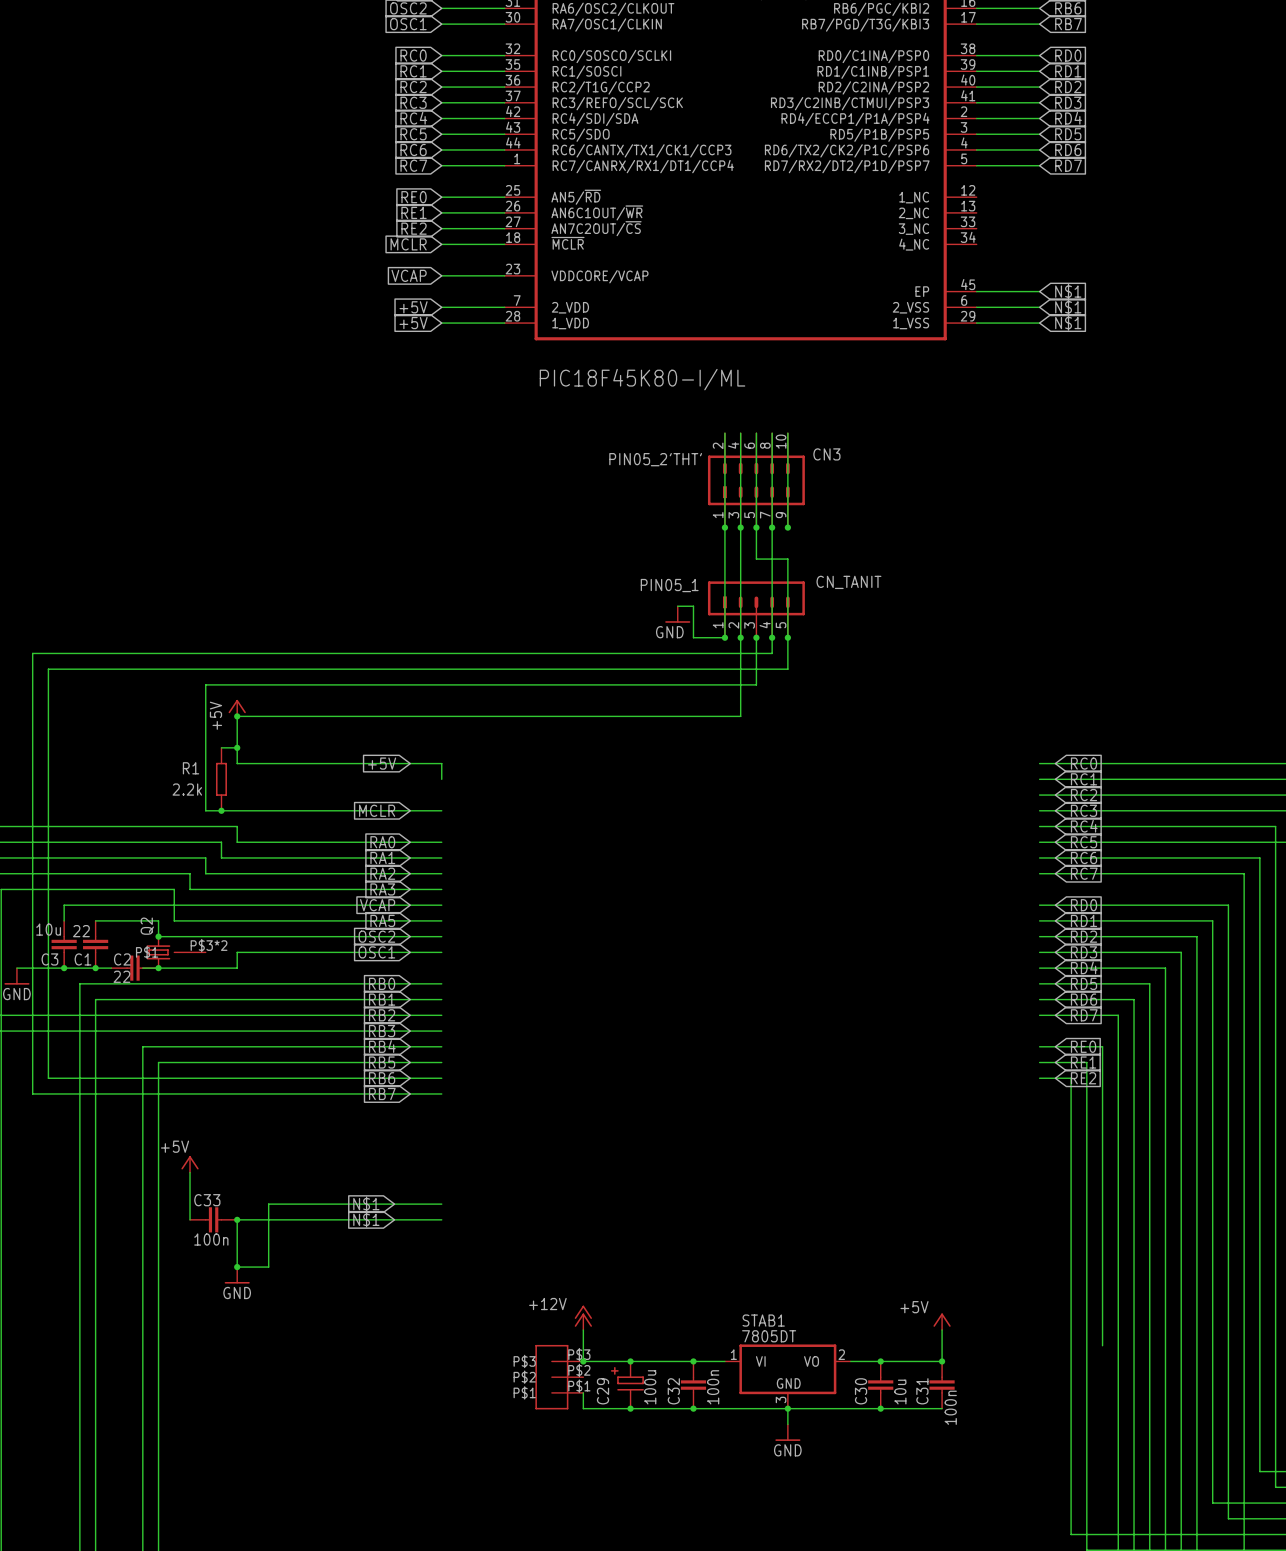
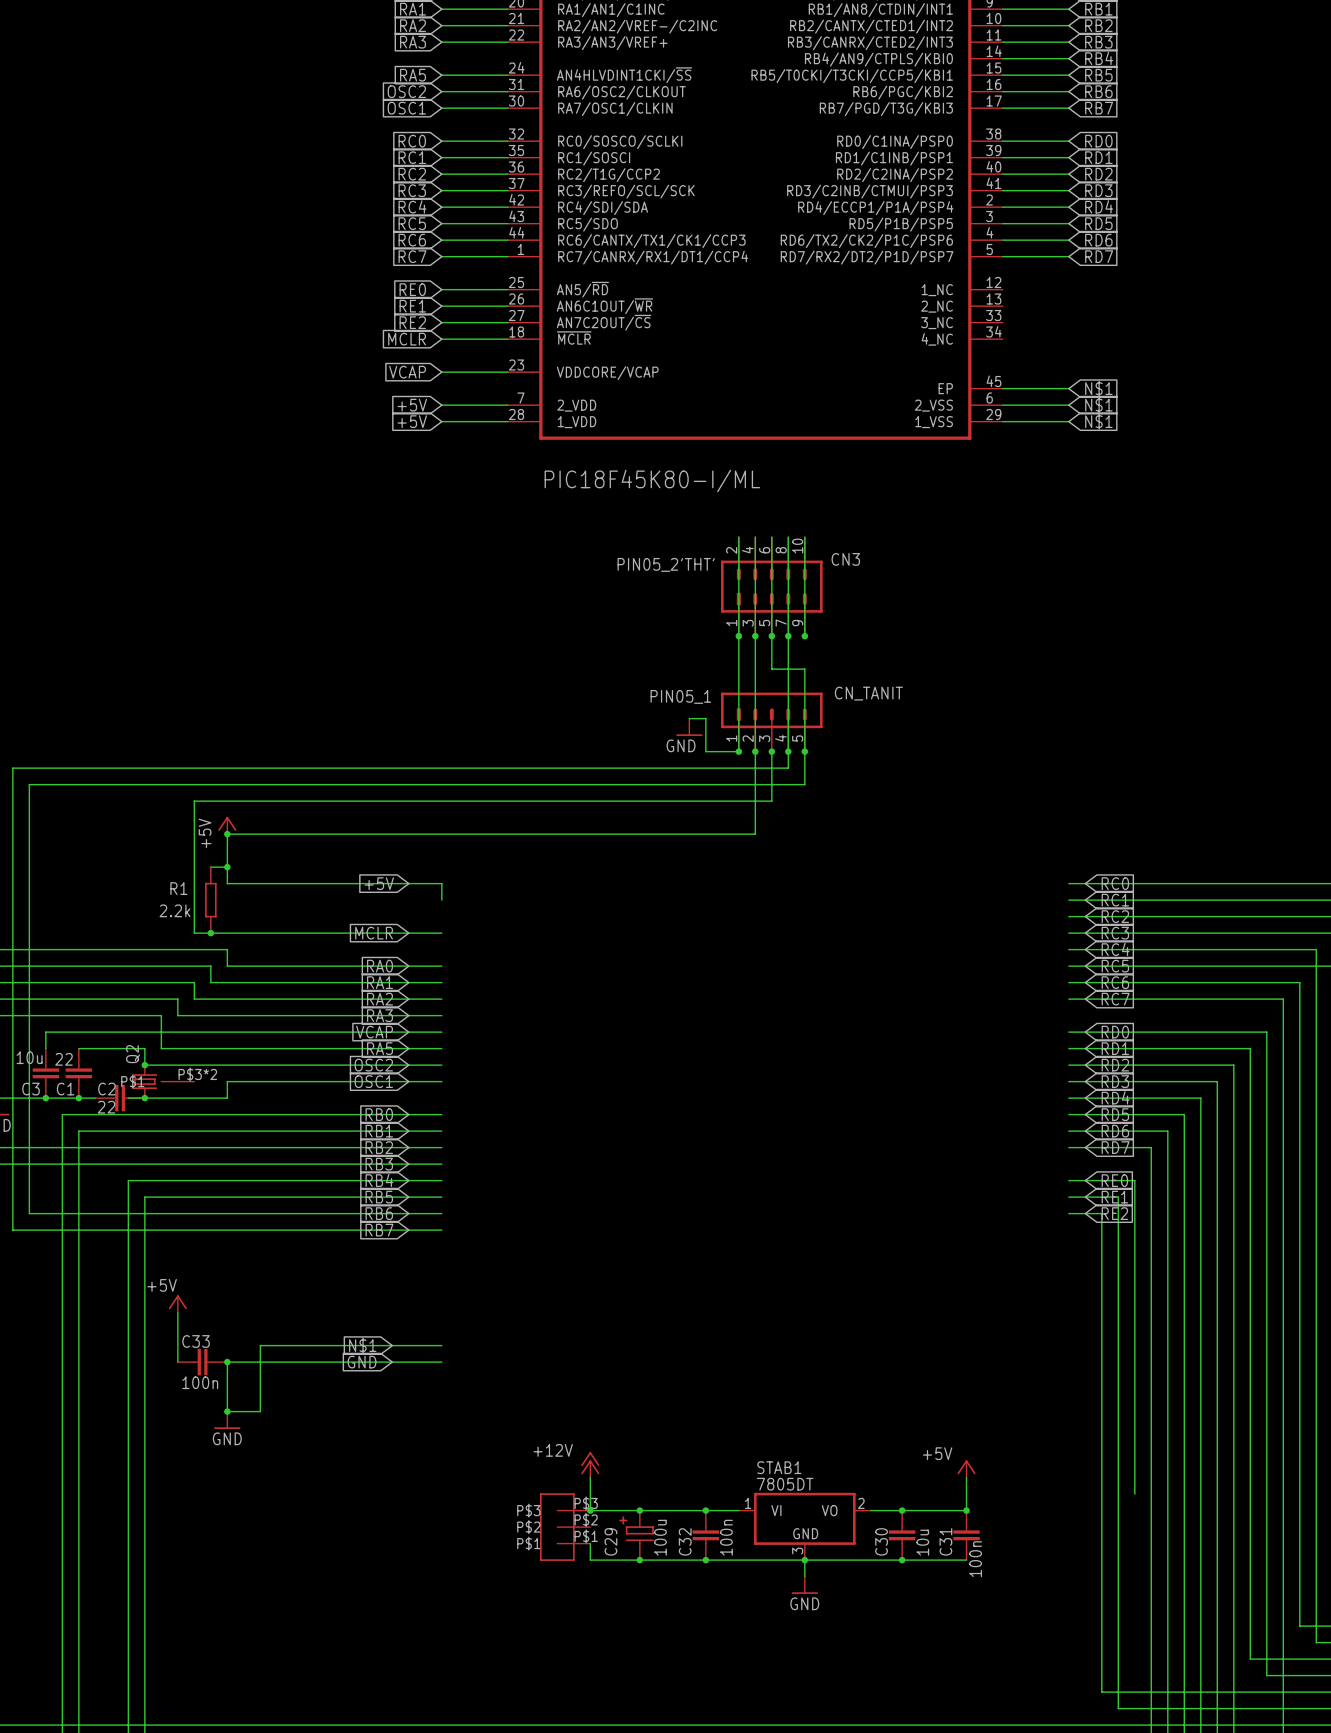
global label: N$1 (366, 1219) -> GND (362, 1362)

